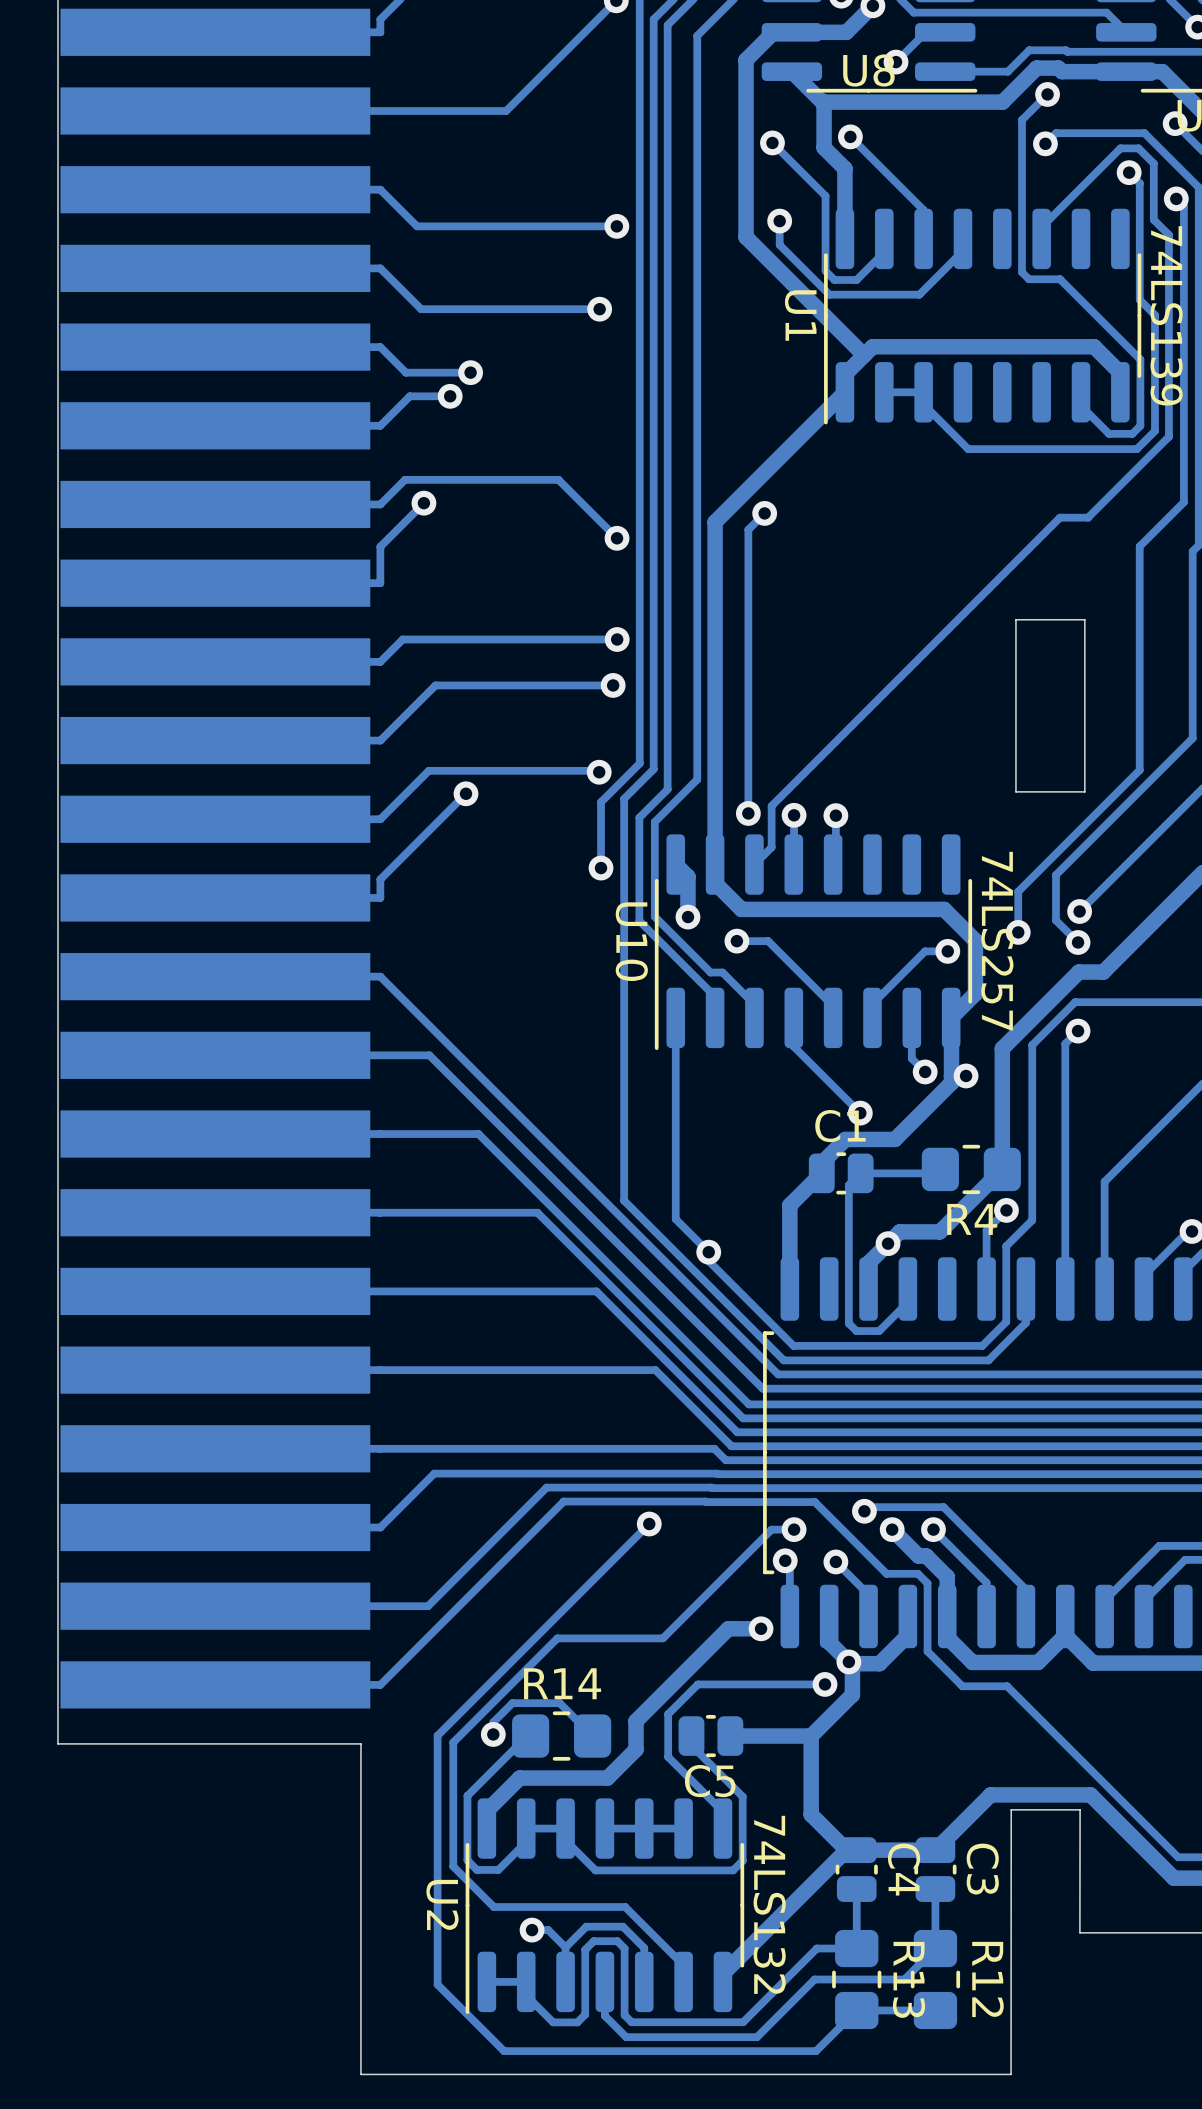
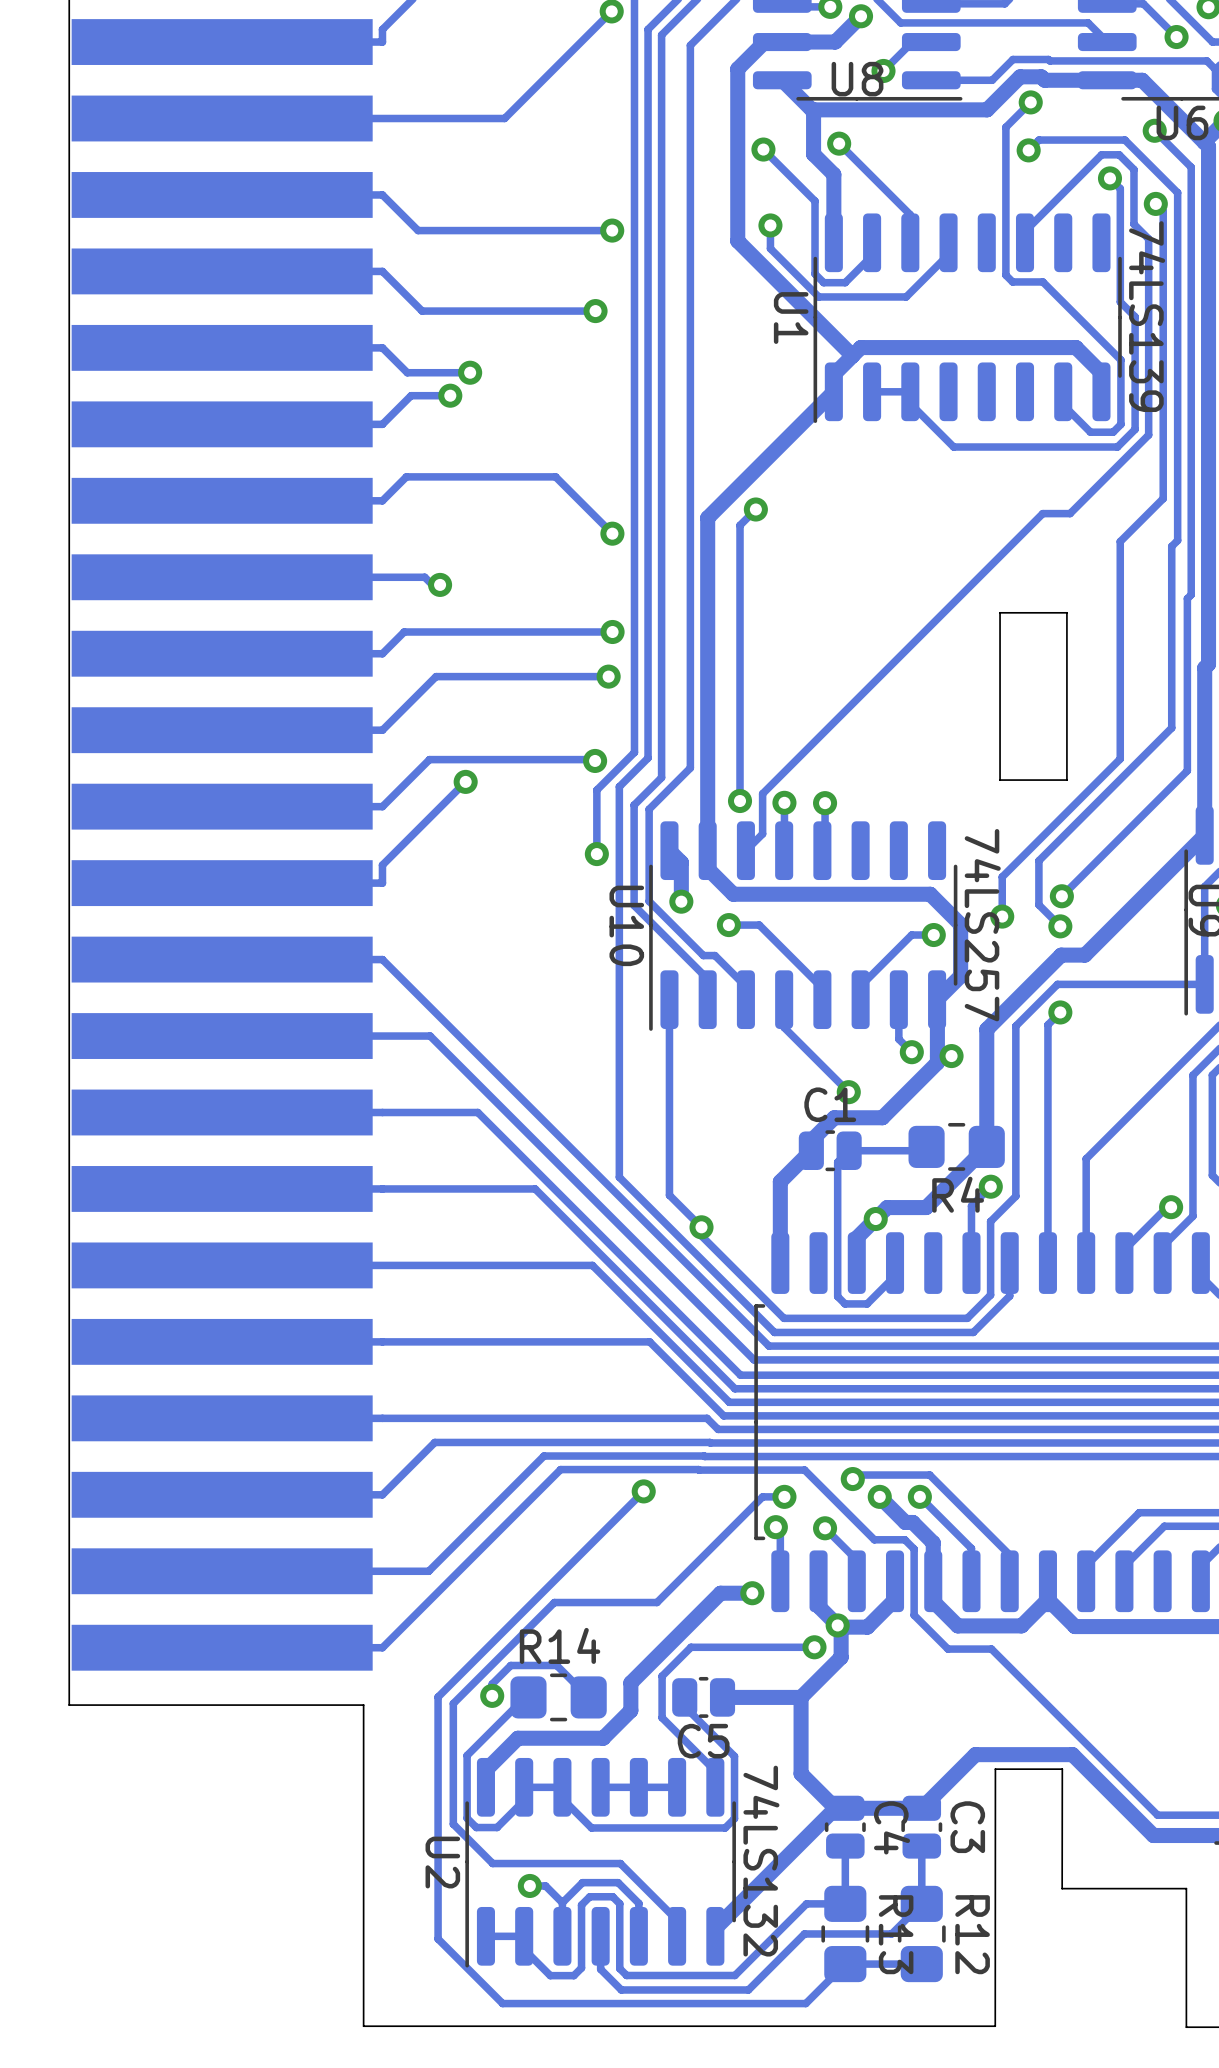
track: (423, 503) (380, 546) (380, 583) -> (440, 584) (432, 584) (424, 577) (382, 577)
via position: (423, 503) -> (440, 584)

